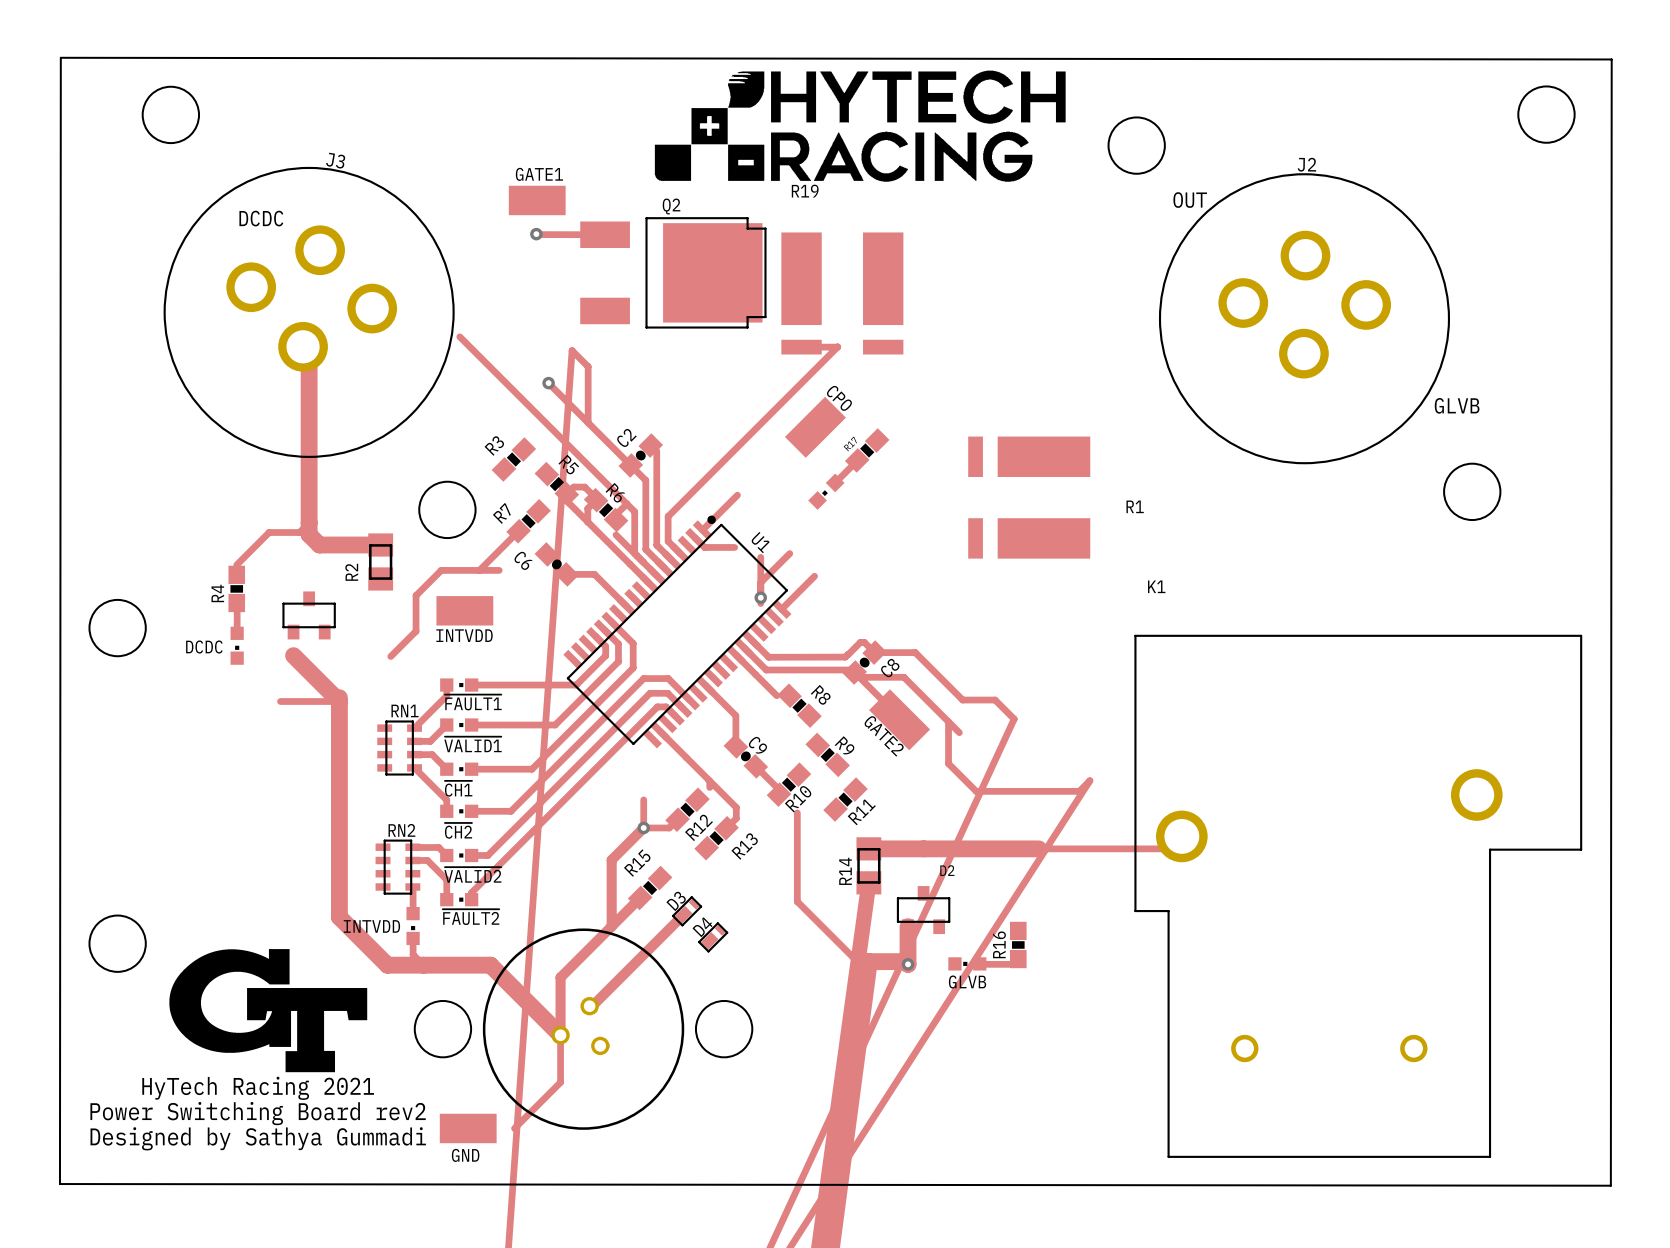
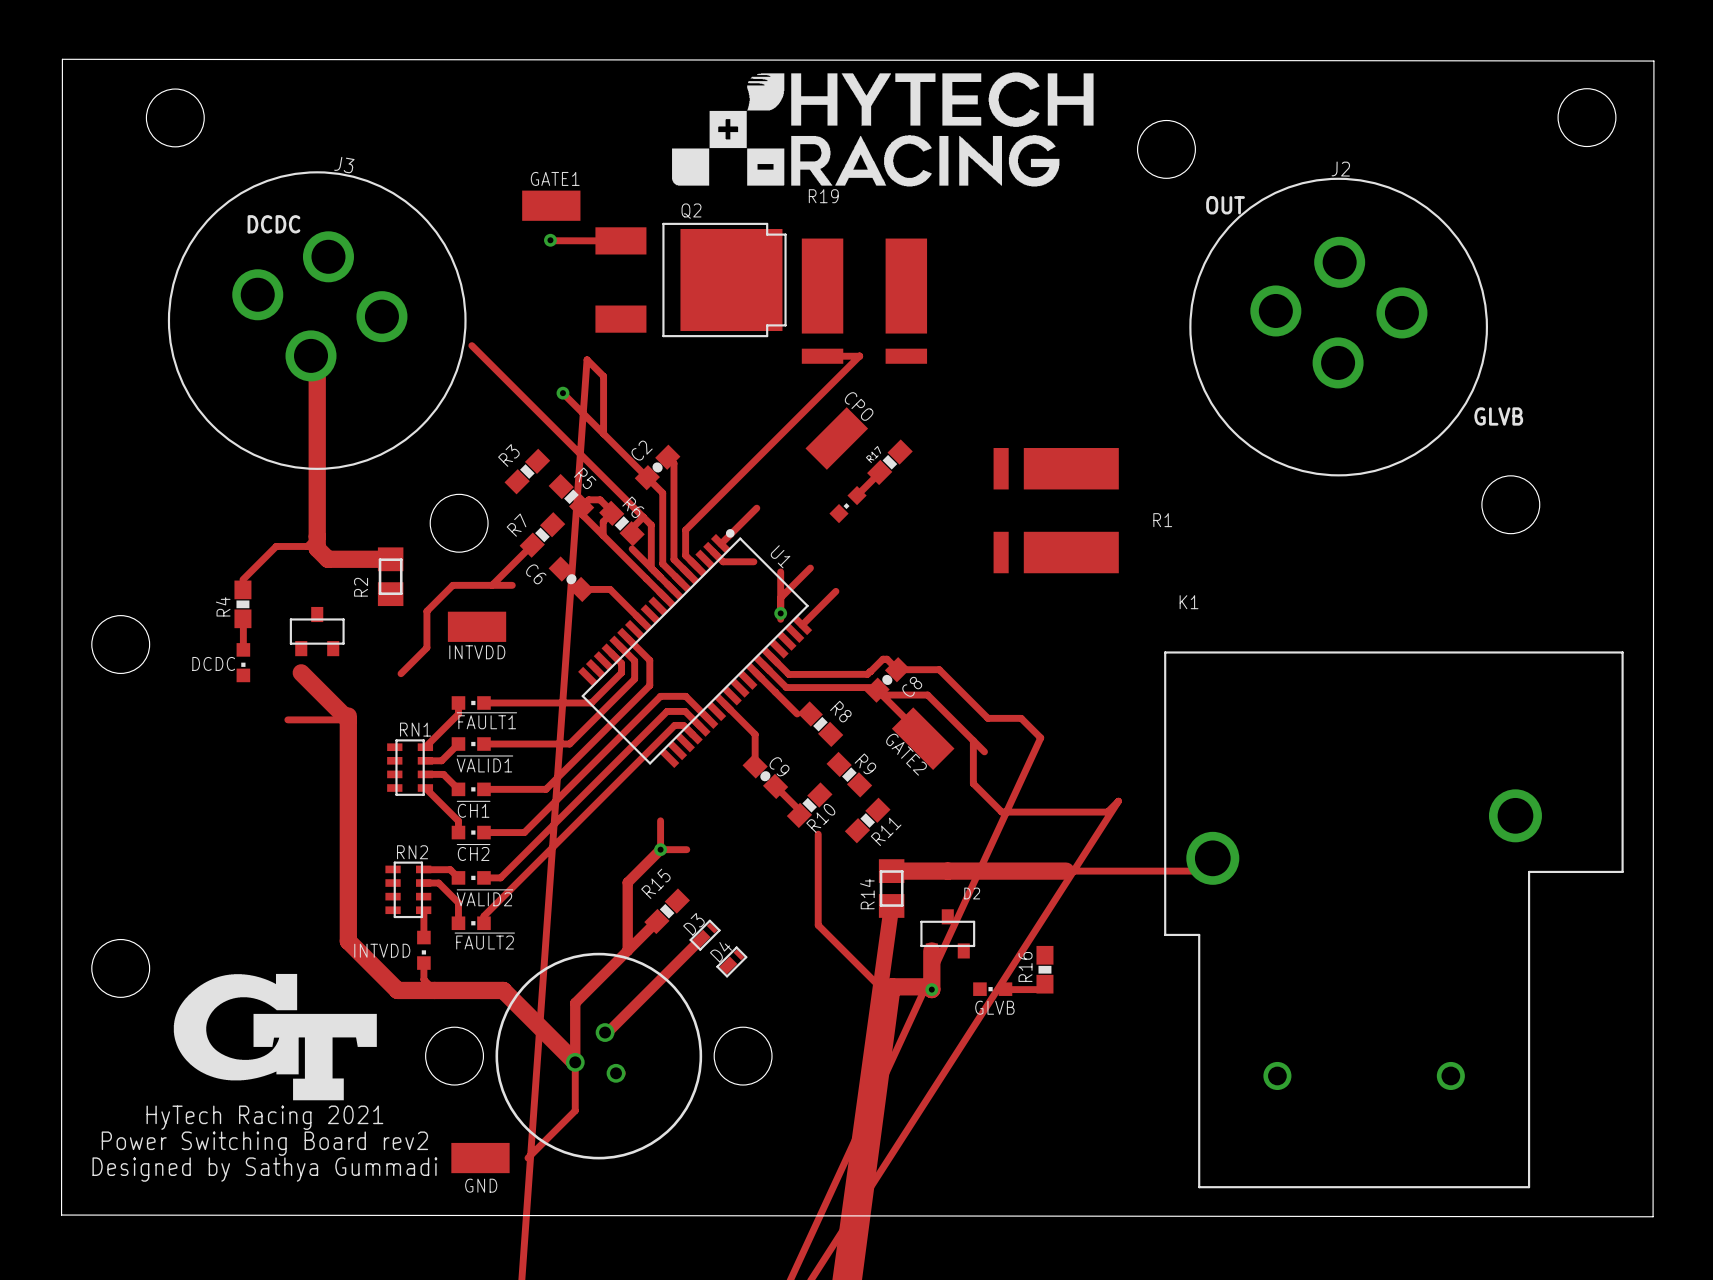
track: (659, 731) (736, 807) (736, 818) (726, 828) -> none
track: (709, 780) (709, 787) -> none
R12: (687, 809) -> none
R13: (716, 838) -> none

